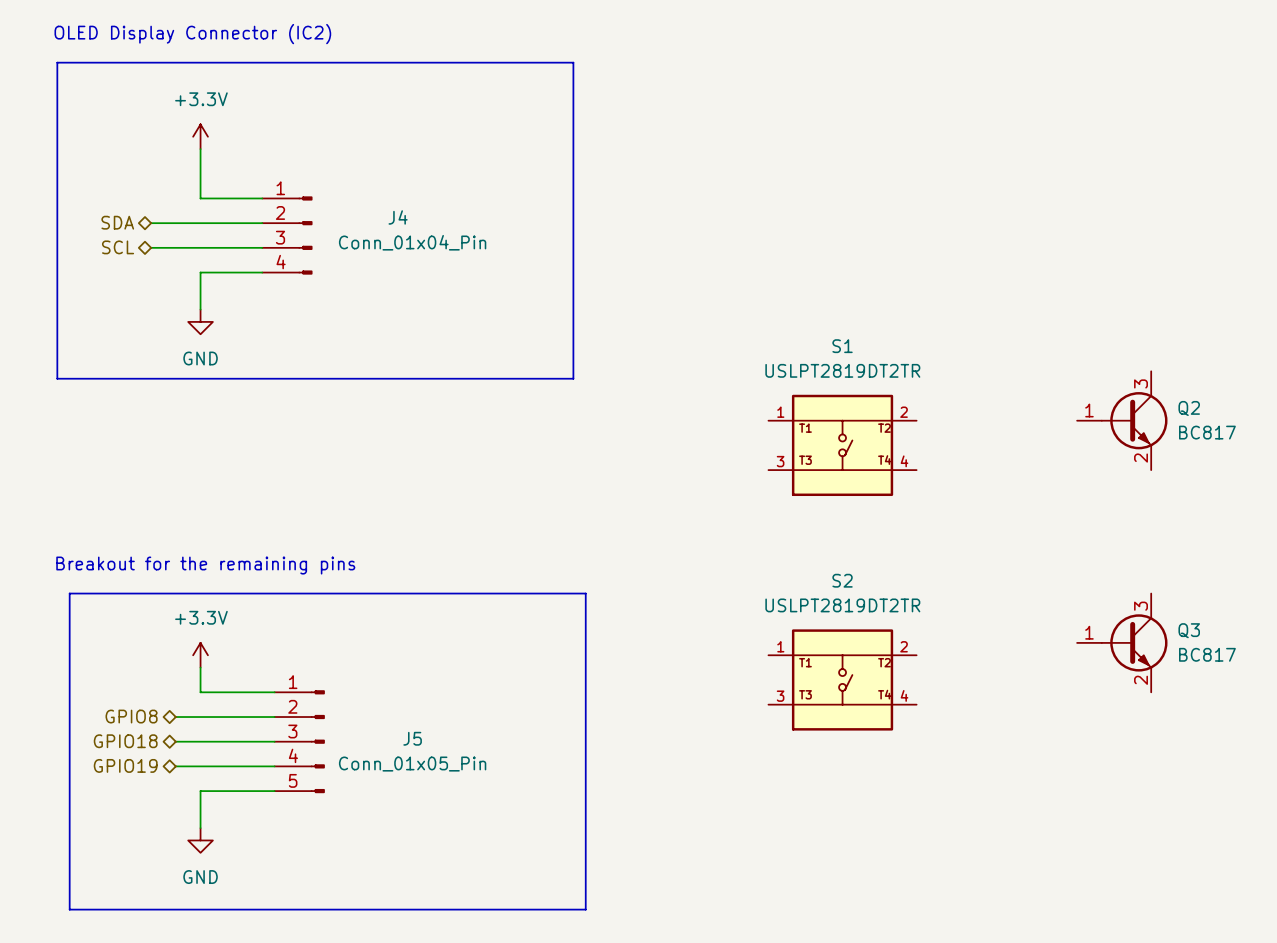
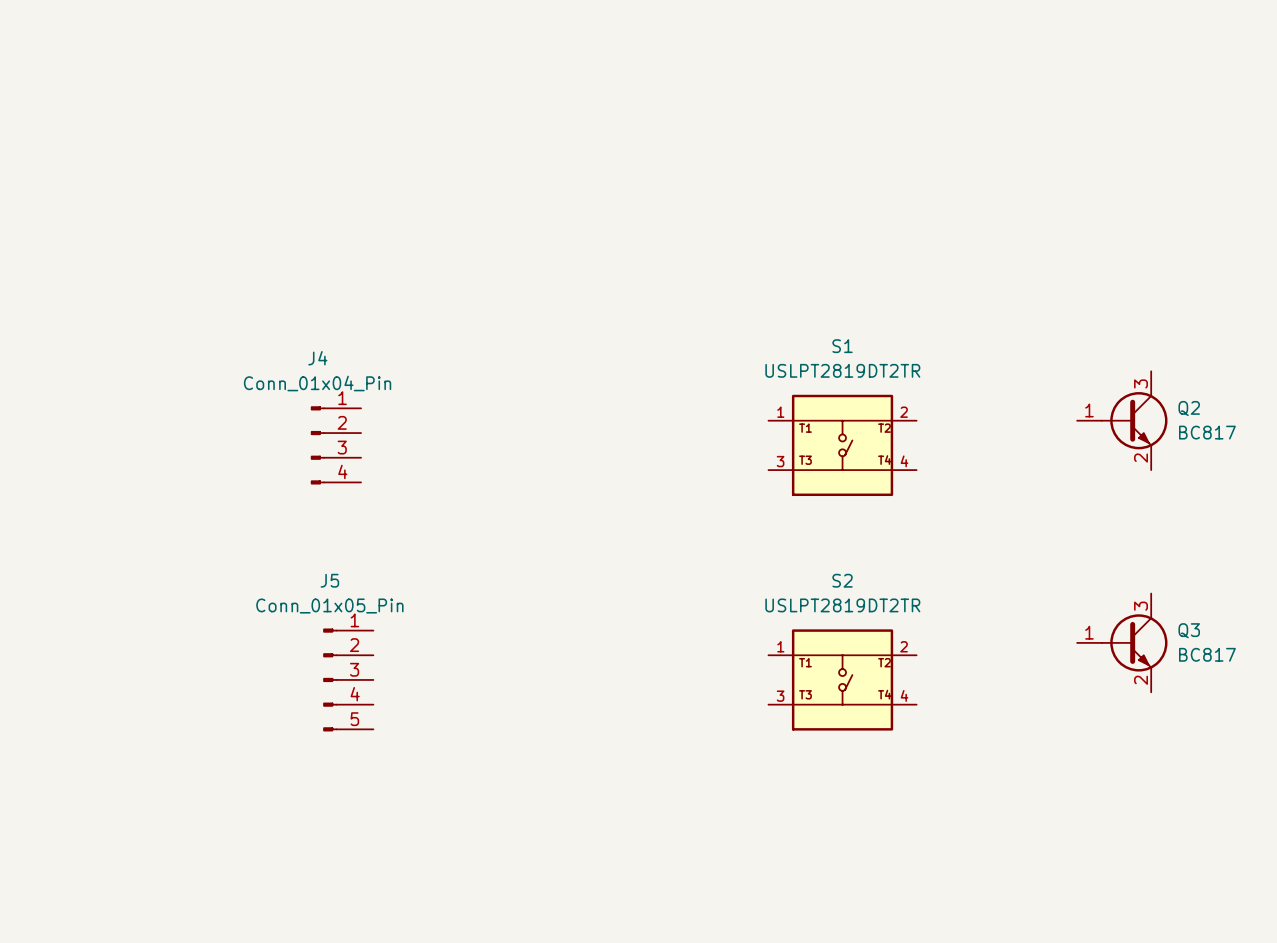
text: OLED Display Connector (IC2) (192, 34) -> none
line: (57, 62) (573, 62) (573, 378) (57, 378) (57, 62) -> none
power symbol: +3.3V (200, 136) -> none
wire: (200, 149) (200, 198) (262, 198) -> none
J4 name position: J4 (398, 217) -> J4 (317, 358)
hierarchical label: SDA (117, 222) -> none
wire: (151, 223) (262, 223) -> none
J4 position: (287, 235) -> (335, 445)
J4 flip: as is (305, 235) -> left-right (317, 445)
J4 value position: Conn_01x04_Pin (412, 242) -> Conn_01x04_Pin (317, 383)
hierarchical label: SCL (118, 247) -> none
wire: (151, 247) (262, 247) -> none
wire: (262, 272) (200, 272) (200, 309) -> none
power symbol: GND (200, 321) -> none
text: Breakout for the remaining pins (205, 565) -> none
line: (69, 593) (585, 593) (585, 909) (69, 909) (69, 593) -> none
power symbol: +3.3V (200, 655) -> none
wire: (200, 667) (200, 692) (274, 692) -> none
hierarchical label: GPIO8 (131, 716) -> none
wire: (175, 717) (274, 717) -> none
J5 name position: J5 (412, 738) -> J5 (329, 580)
hierarchical label: GPIO18 (125, 741) -> none
wire: (175, 741) (274, 741) -> none
J5 position: (299, 741) -> (348, 679)
J5 flip: as is (317, 741) -> left-right (330, 679)
J5 value position: Conn_01x05_Pin (412, 764) -> Conn_01x05_Pin (329, 606)
hierarchical label: GPIO19 (125, 765) -> none
wire: (175, 766) (274, 766) -> none
wire: (274, 791) (200, 791) (200, 828) -> none
power symbol: GND (200, 840) -> none

